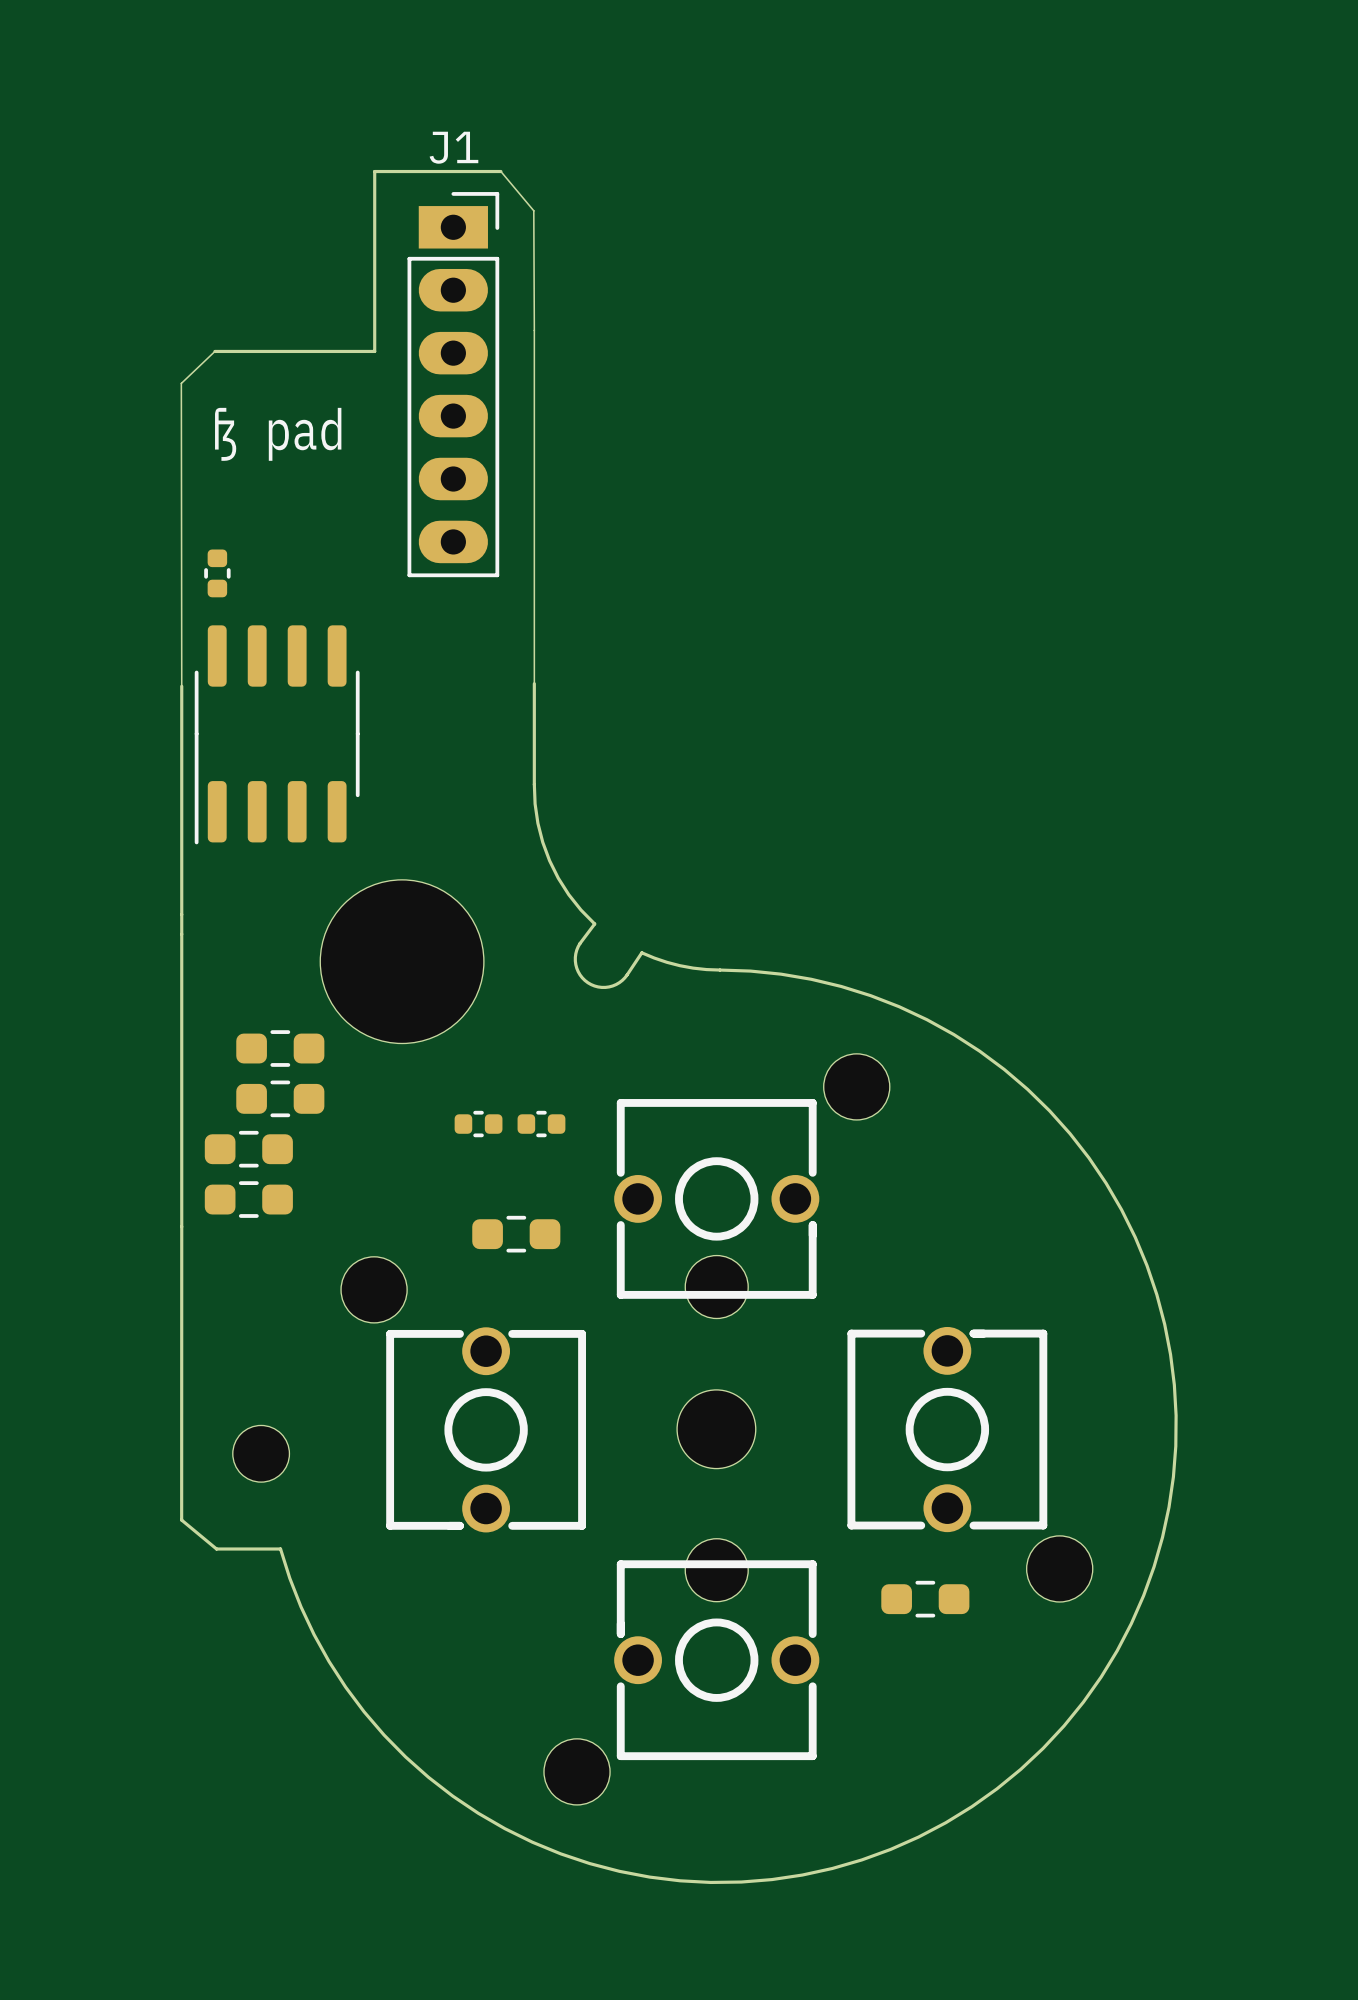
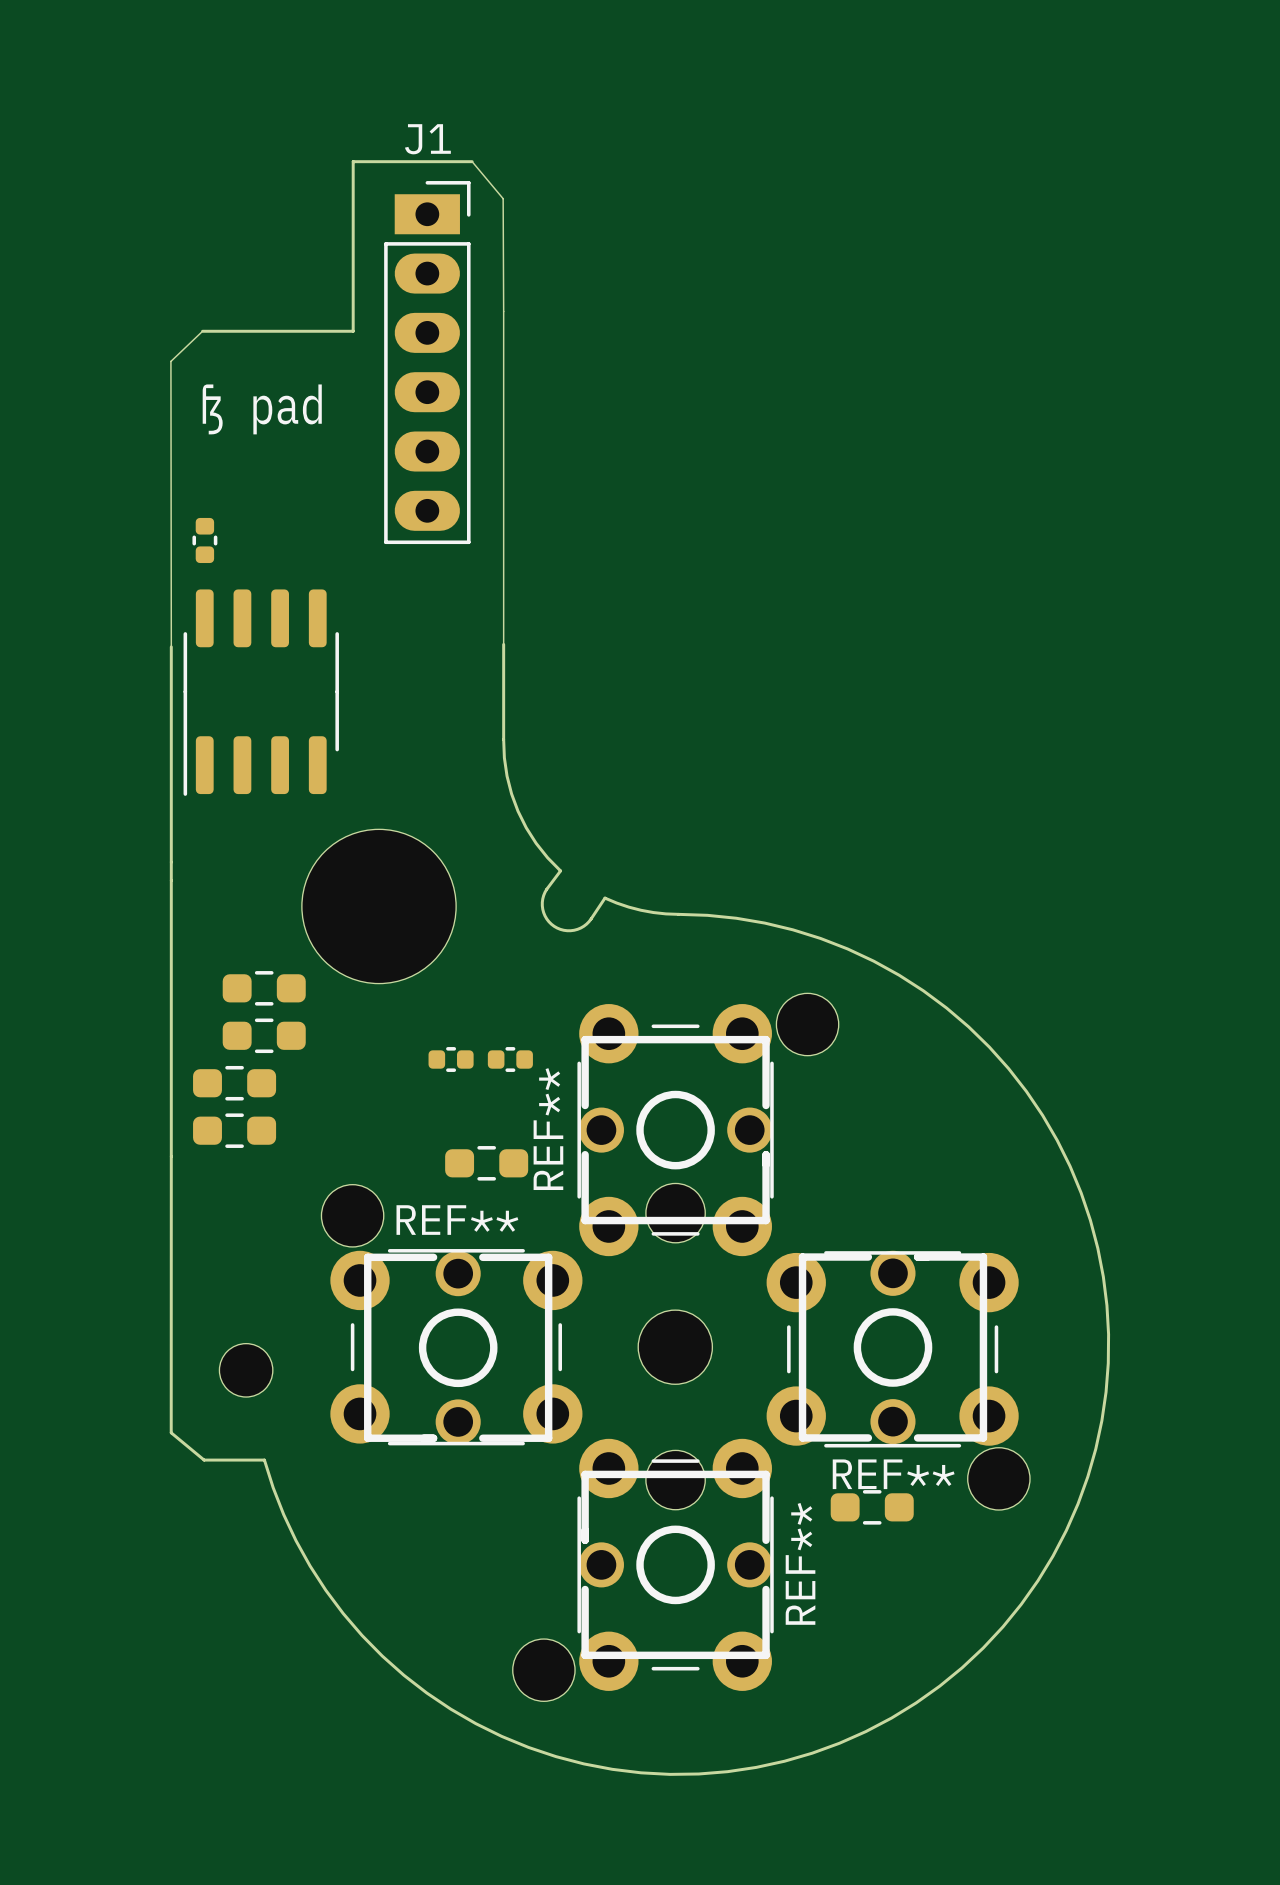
REF**: none -> (675, 1130)
REF**: none -> (456, 1347)
REF**: none -> (892, 1349)
REF**: none -> (675, 1564)

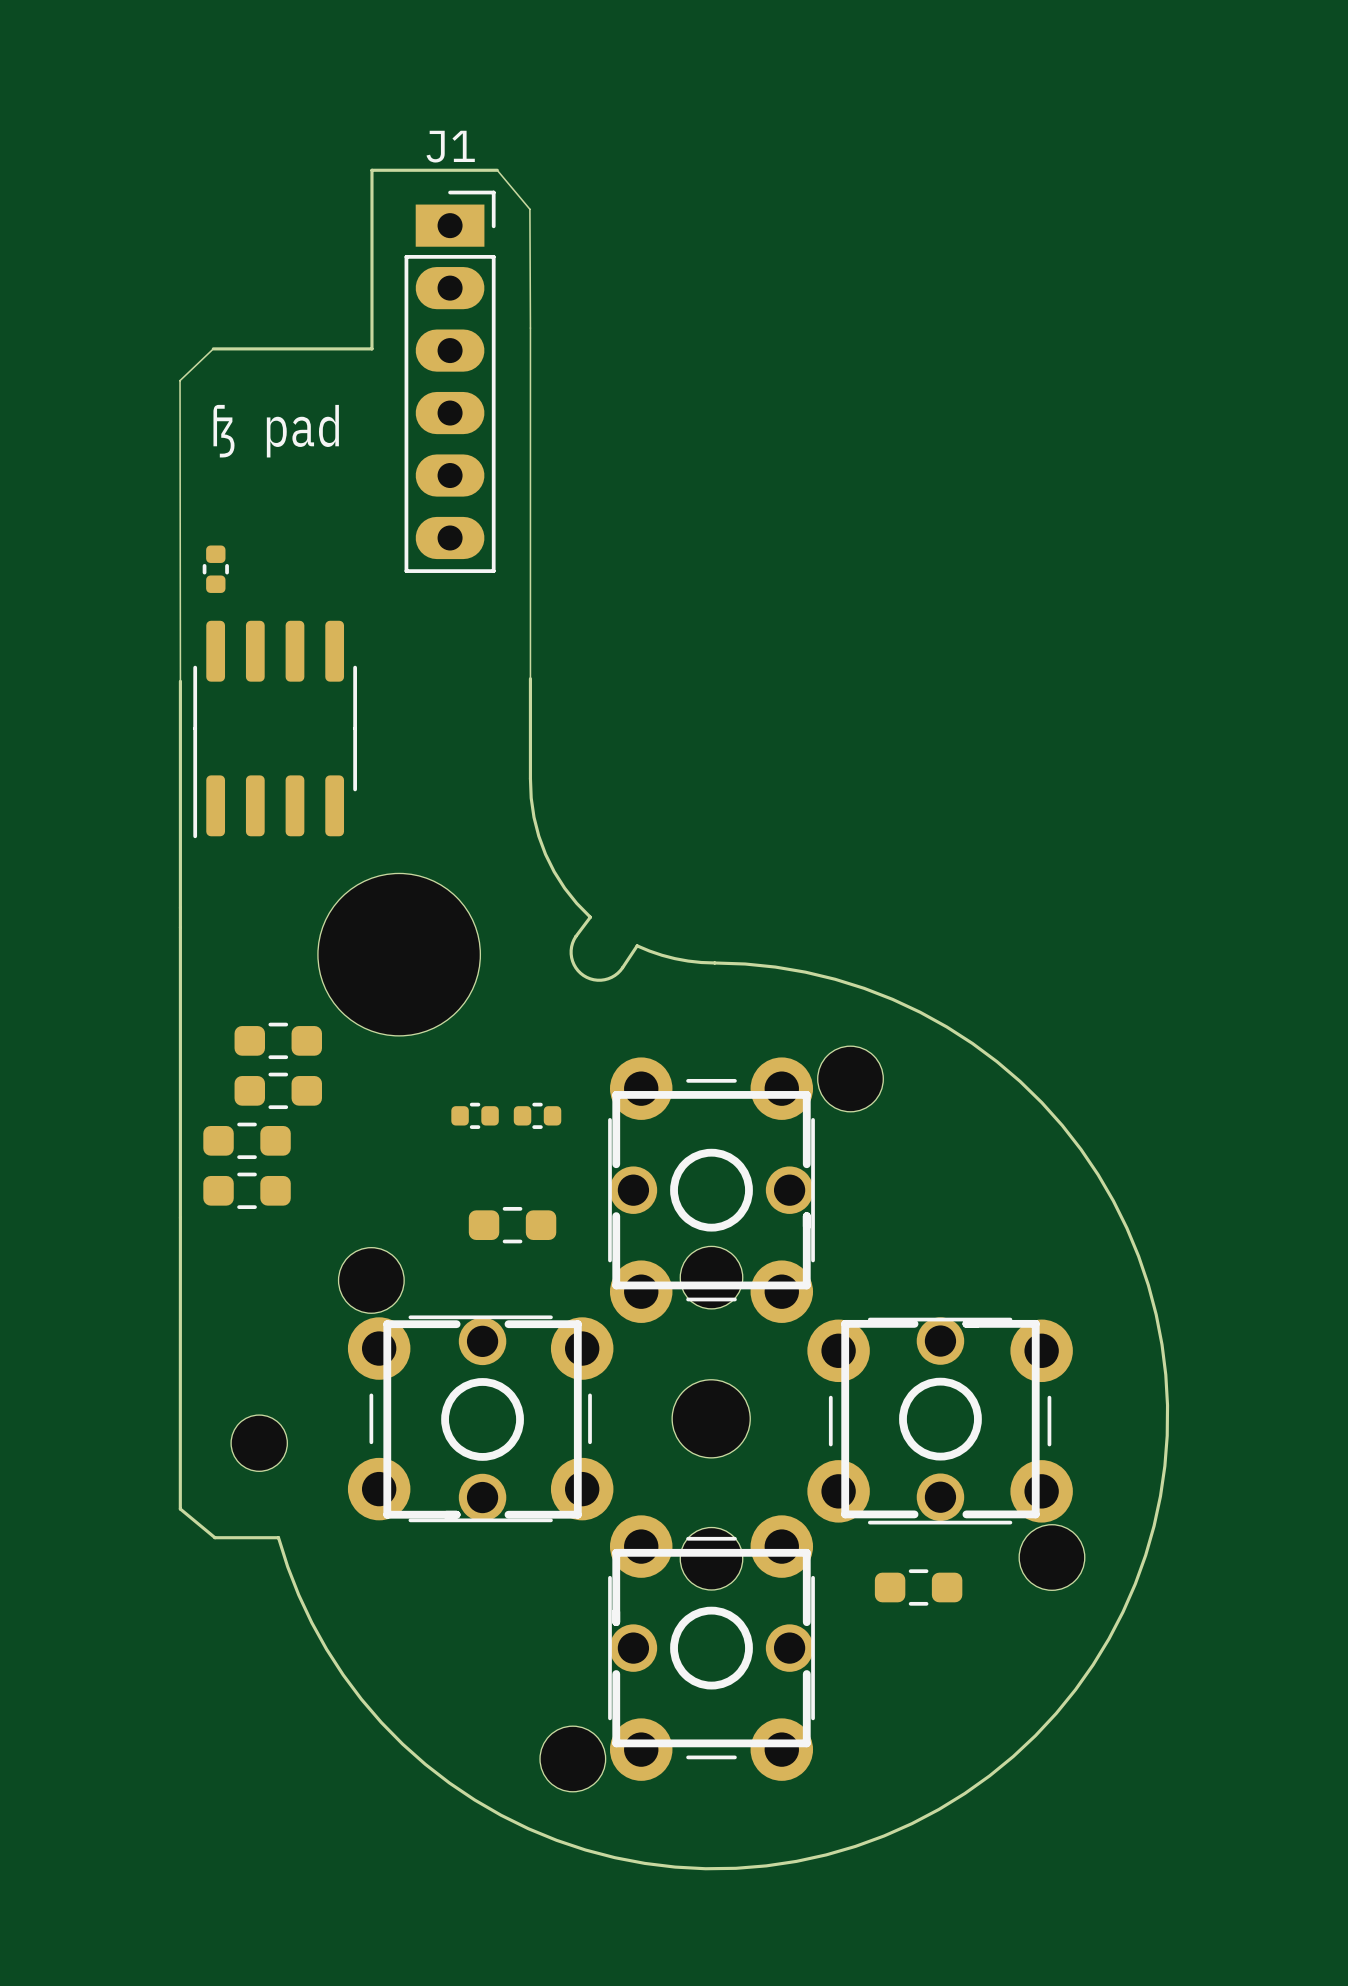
REF** name: REF** (548, 1129) -> none
REF** name: REF** (457, 1220) -> none
REF** name: REF** (893, 1474) -> none
REF** name: REF** (800, 1563) -> none

